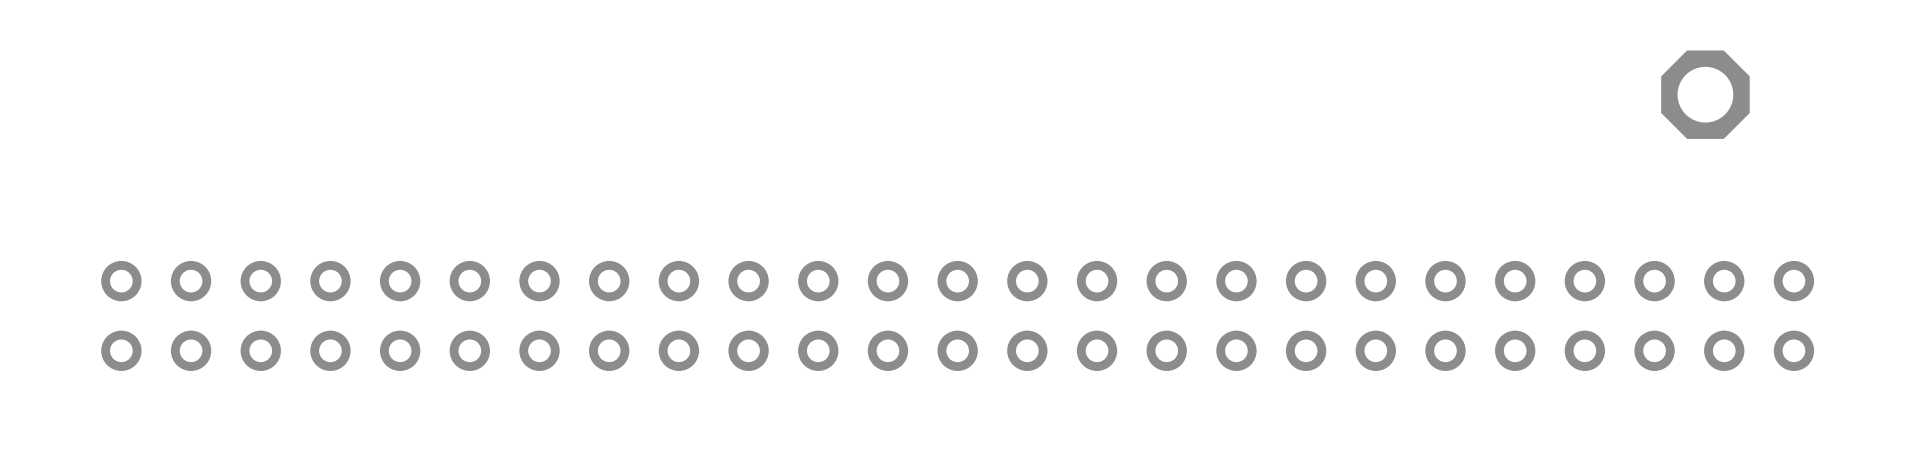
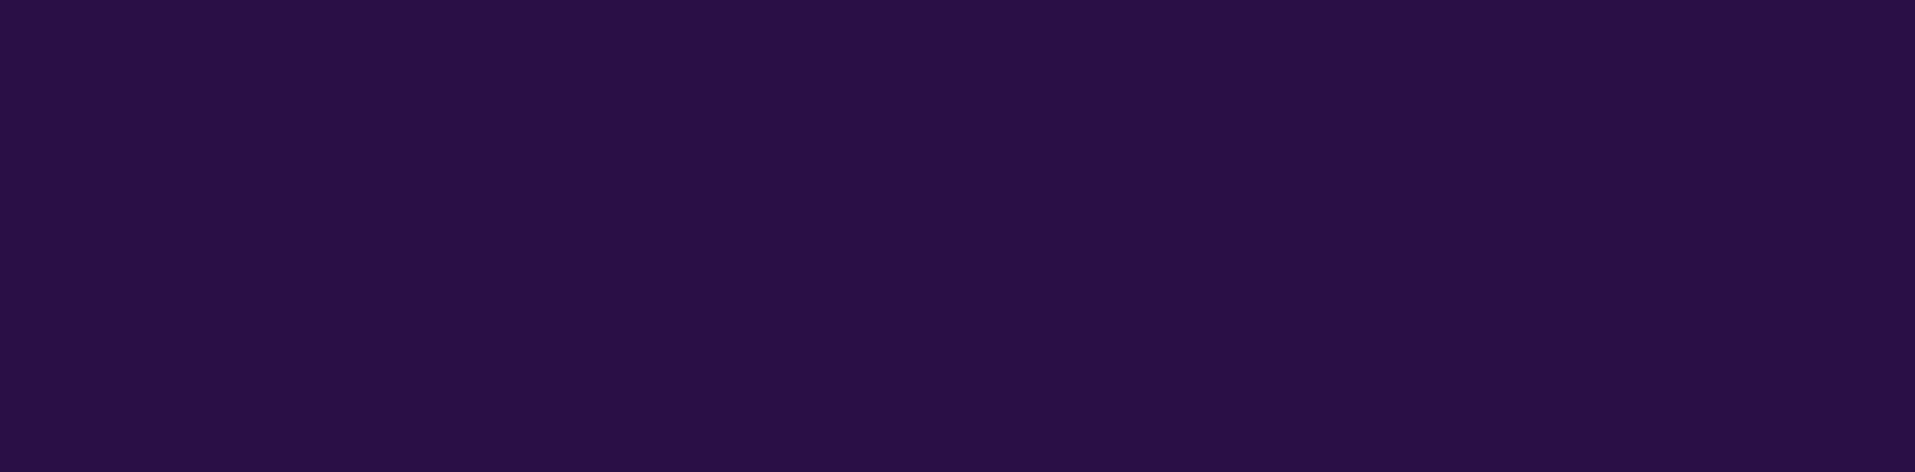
part: (1705, 94) -> none
part: (957, 315) -> none

